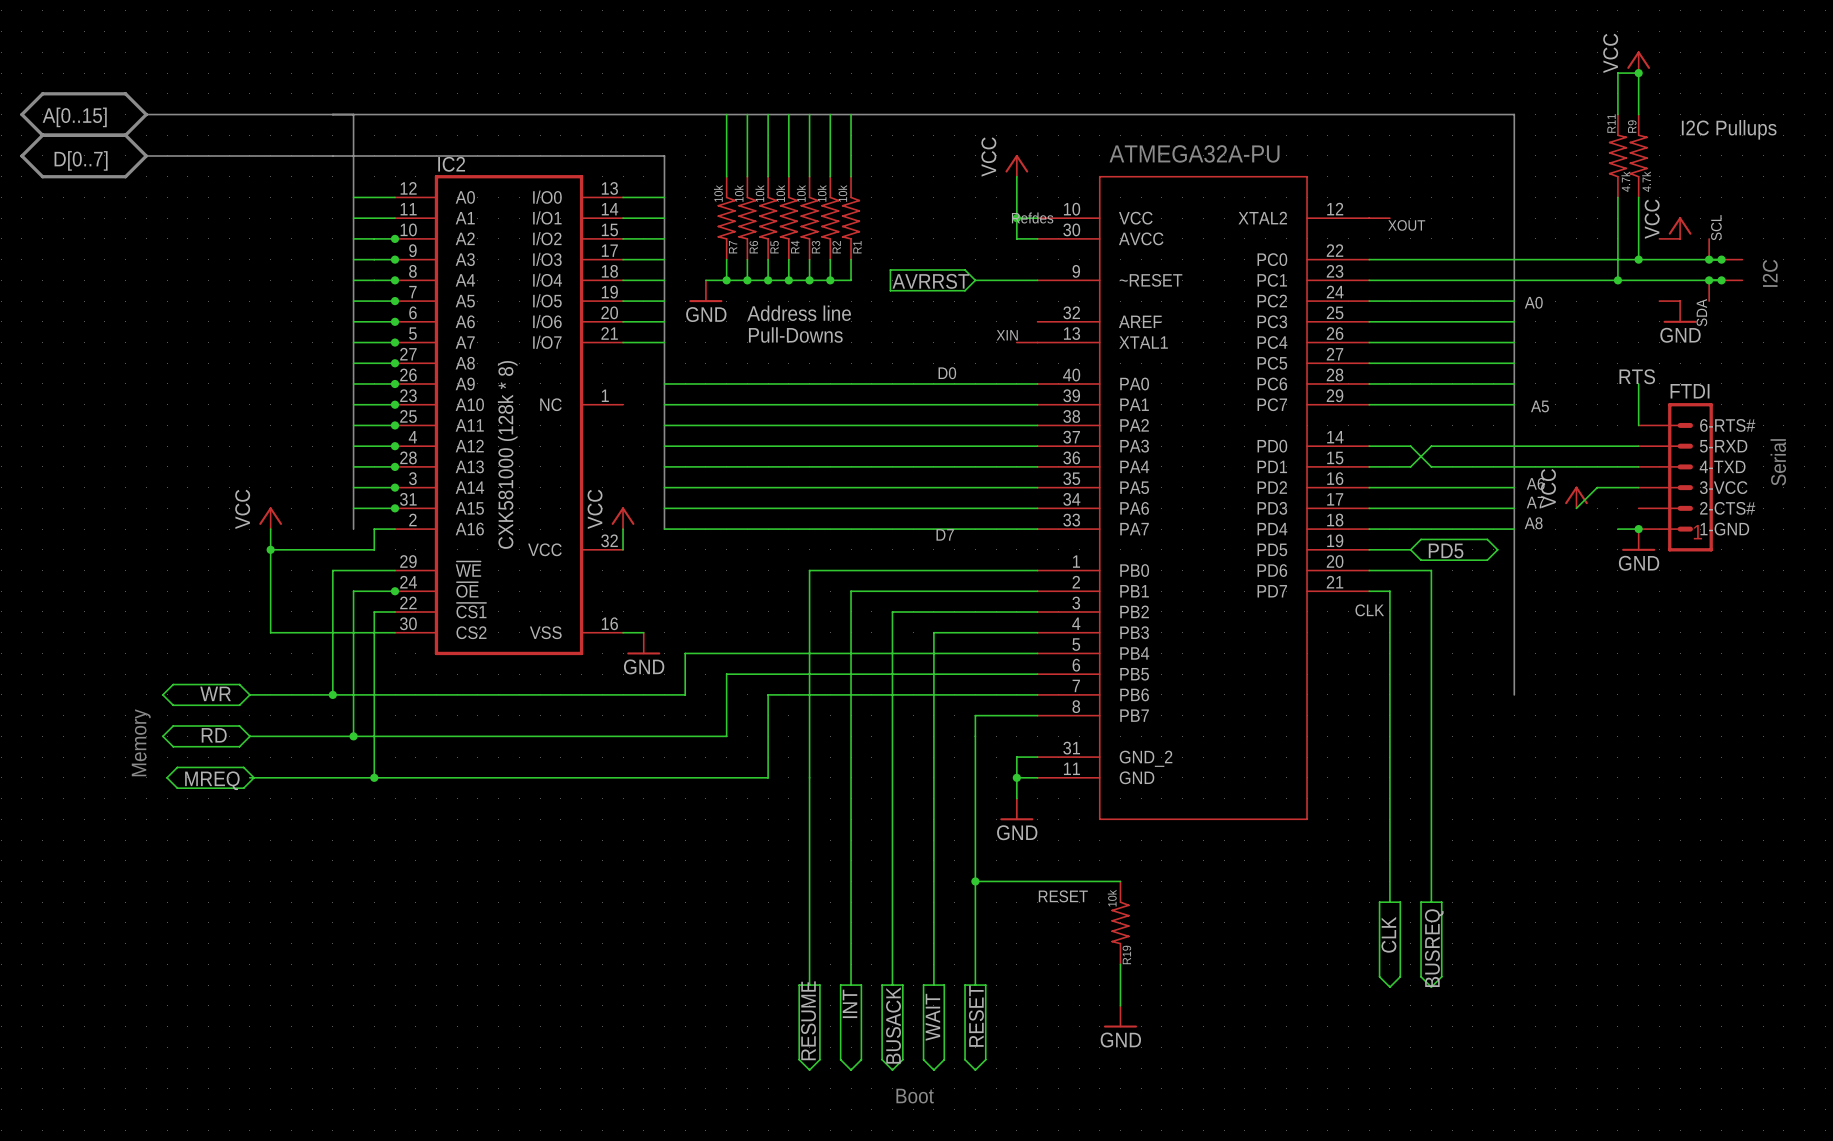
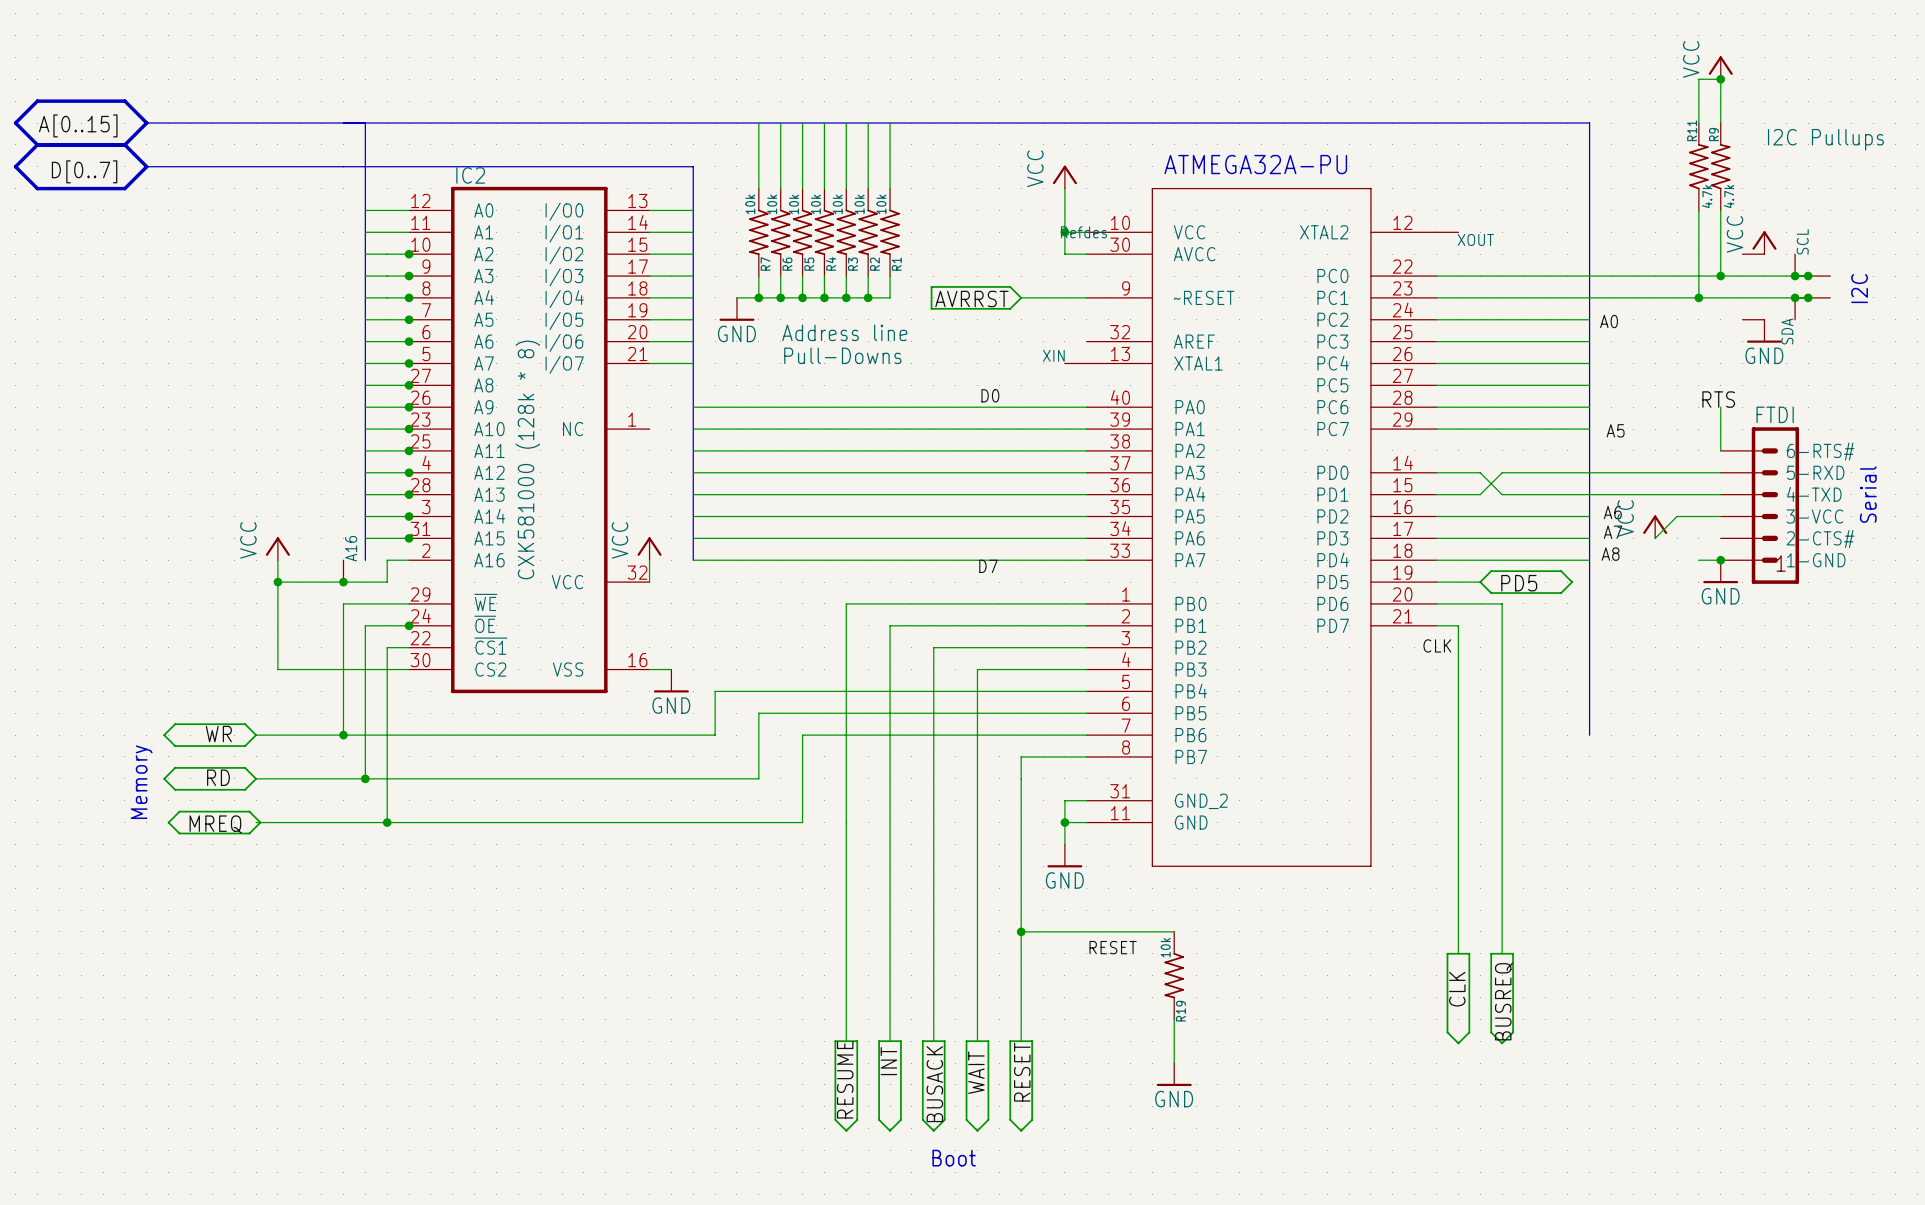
A16: none -> (343, 571)
junction: none -> (343, 582)

